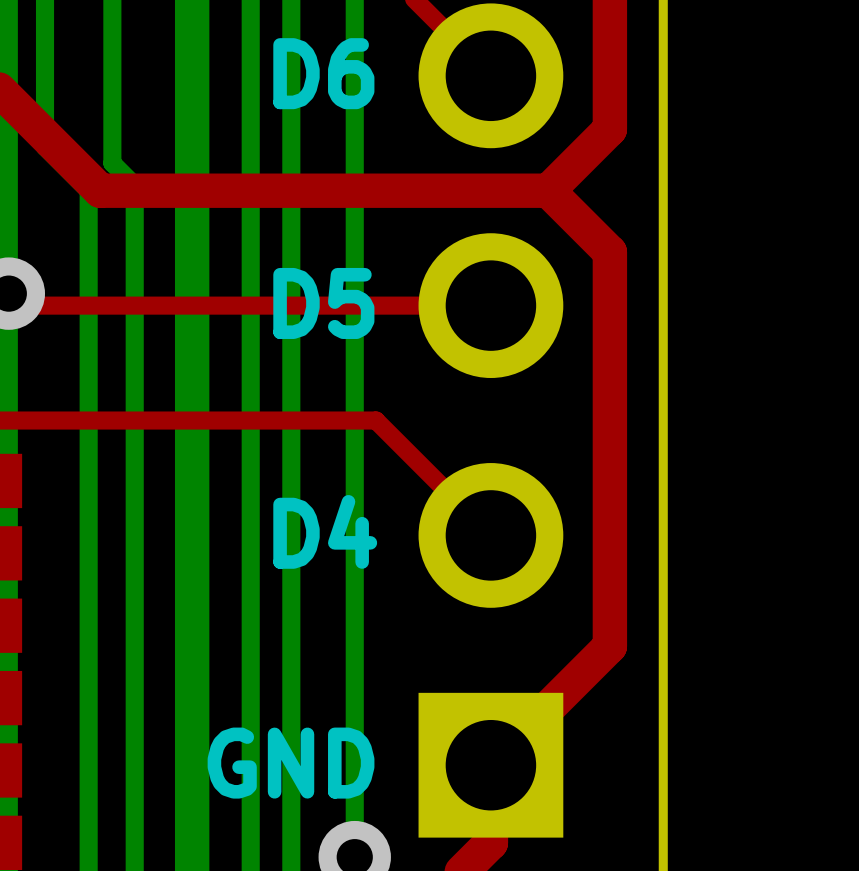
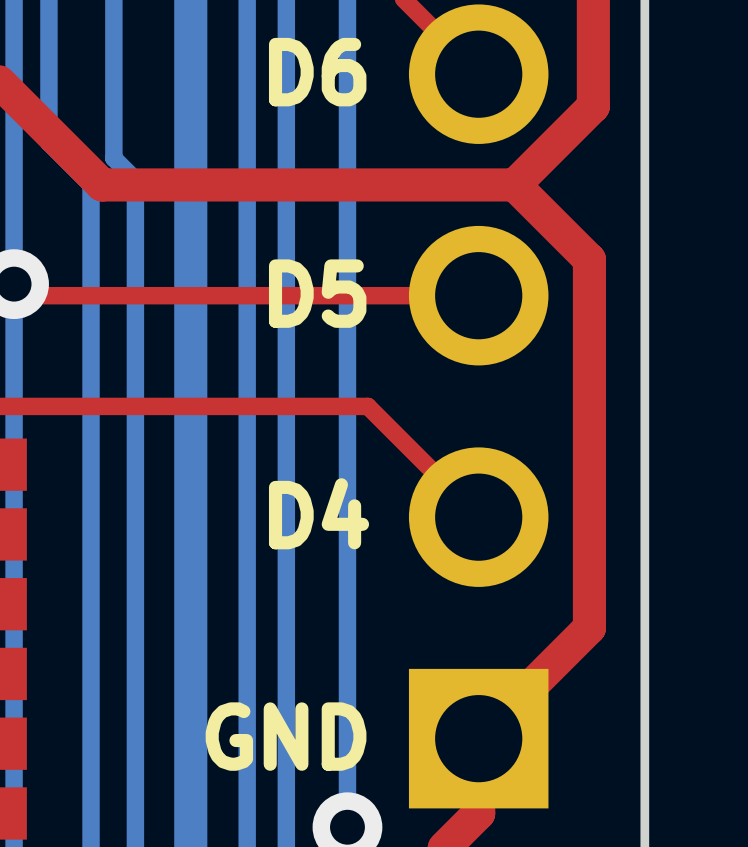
top track: (609, 109) (609, 129) (548, 190) -> none
top track: (548, 190) (609, 252) (609, 646) (605, 650) -> (593, 106) (514, 184) (589, 259) (589, 627)

